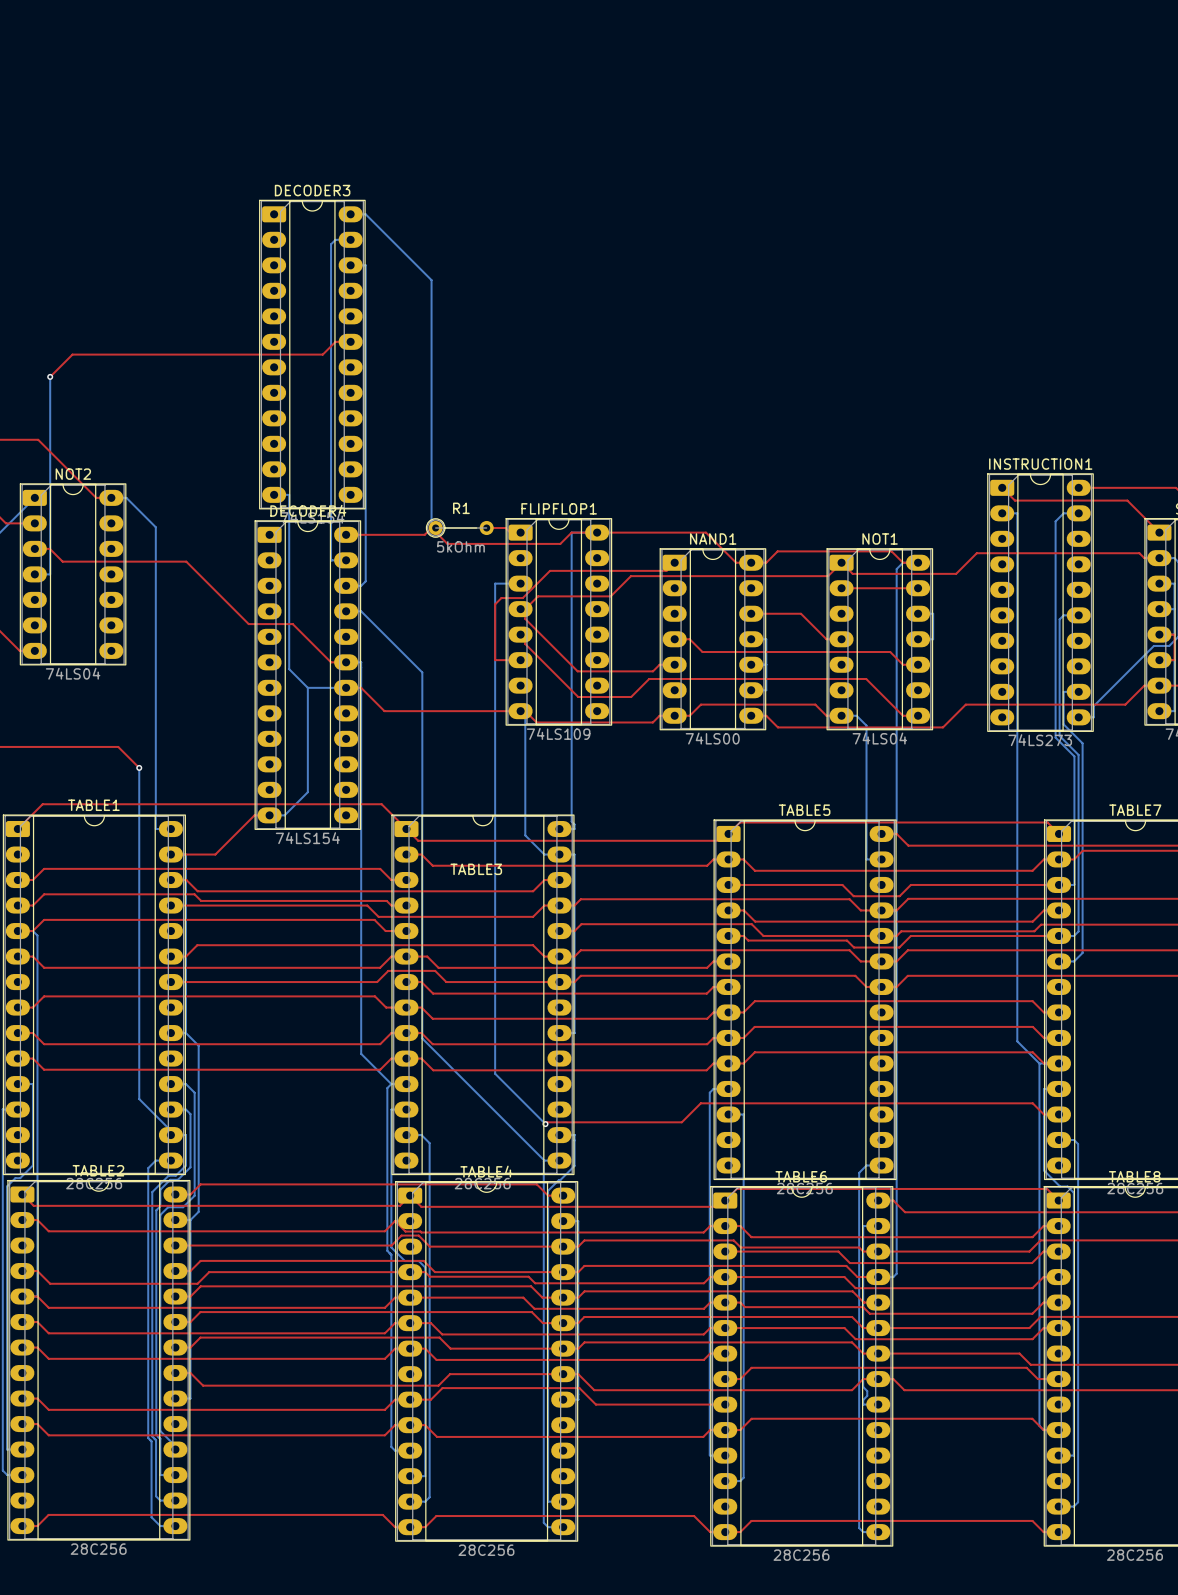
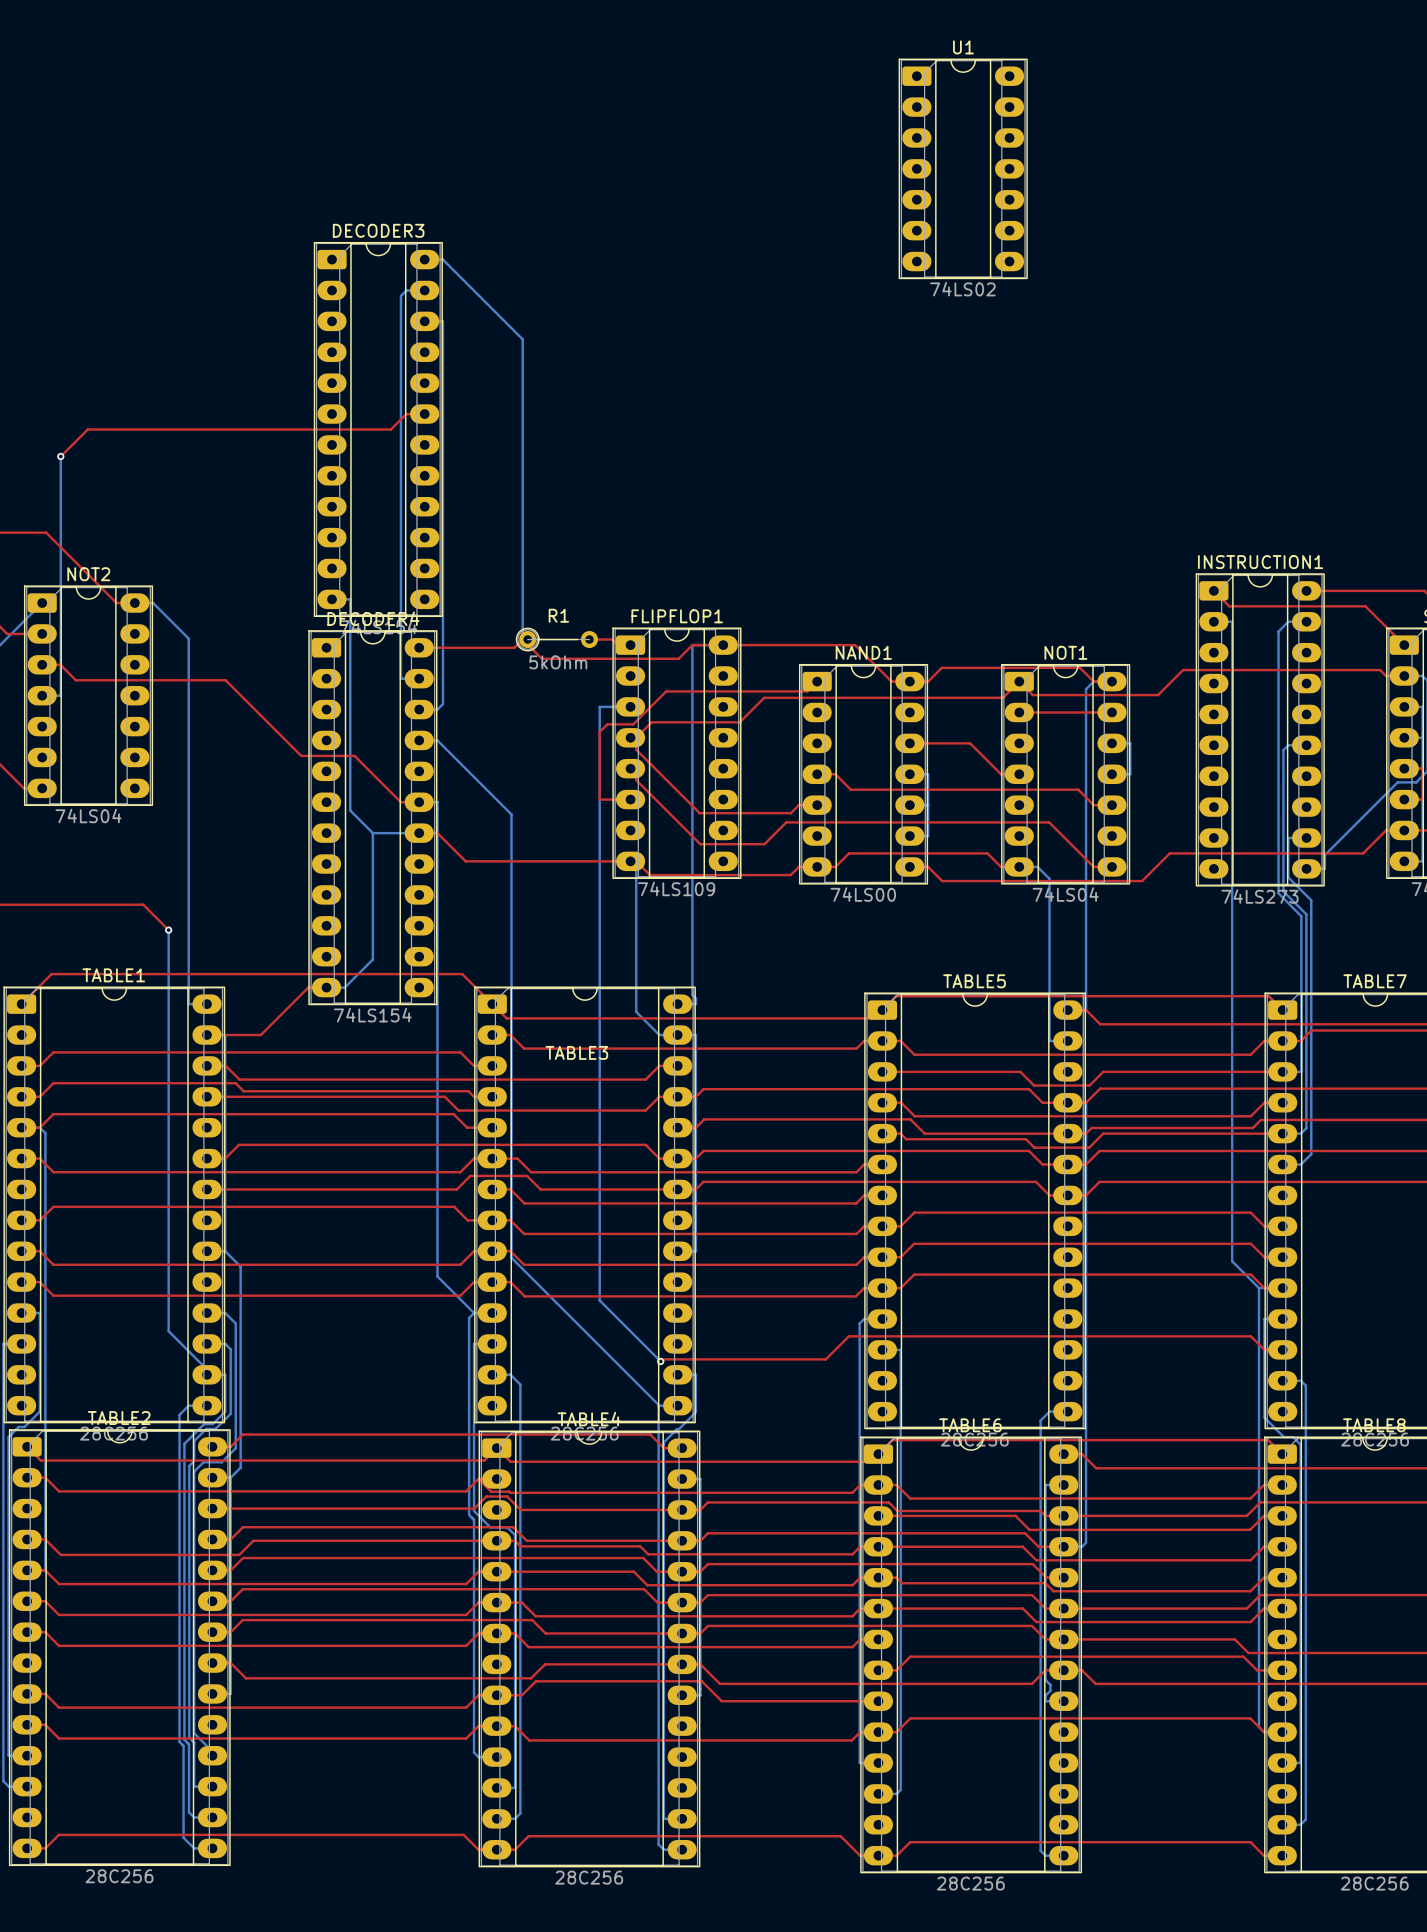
U1: none -> 74LS02 (963, 168)

